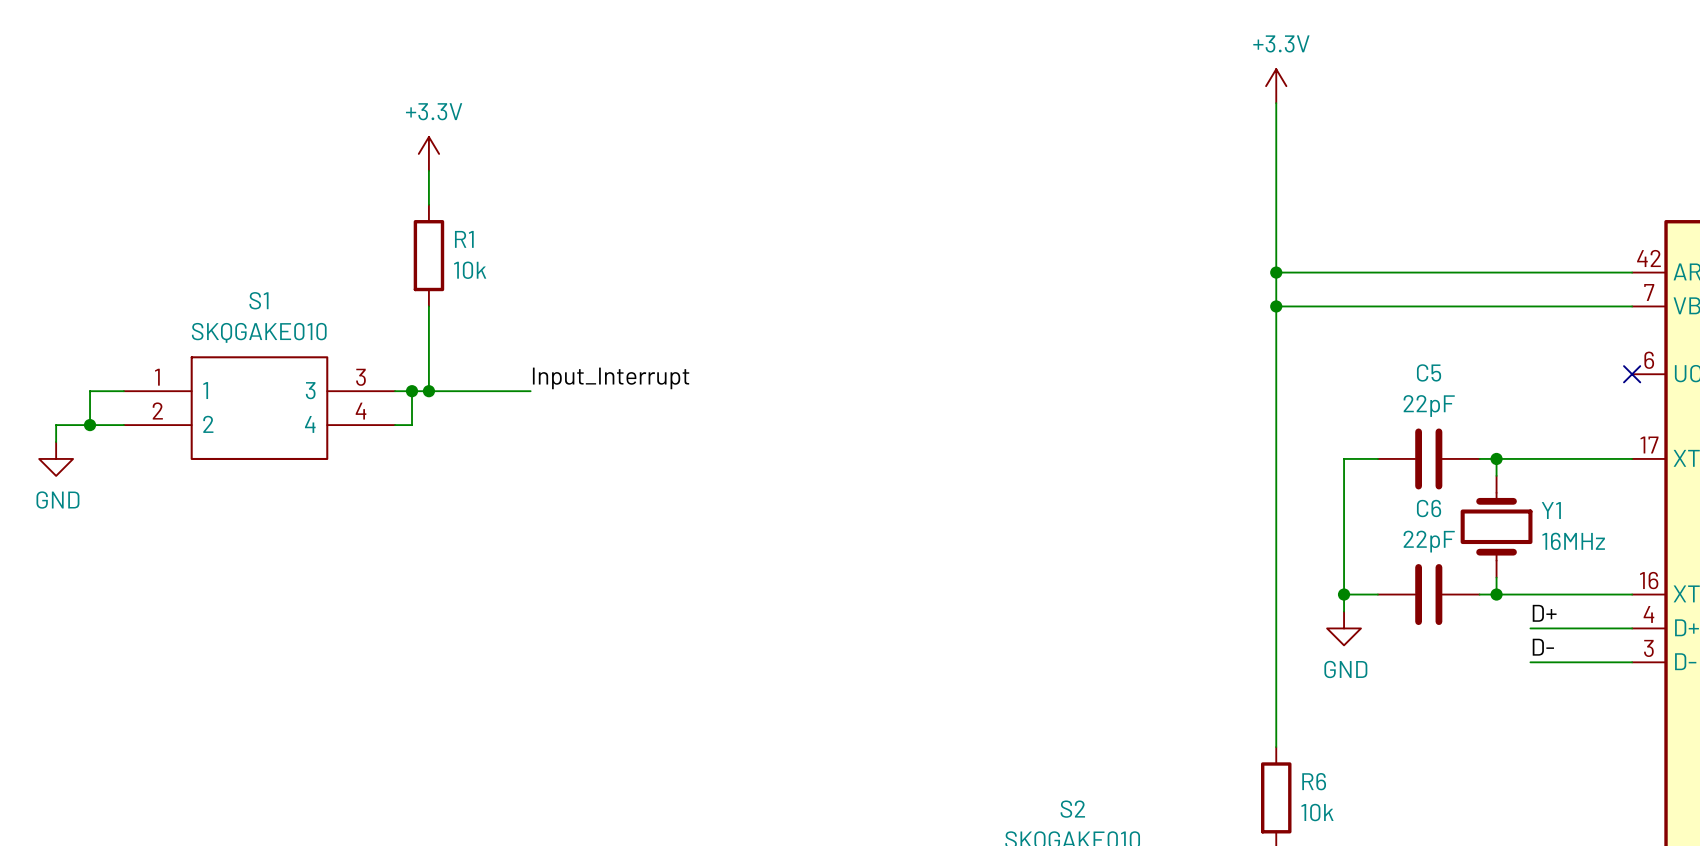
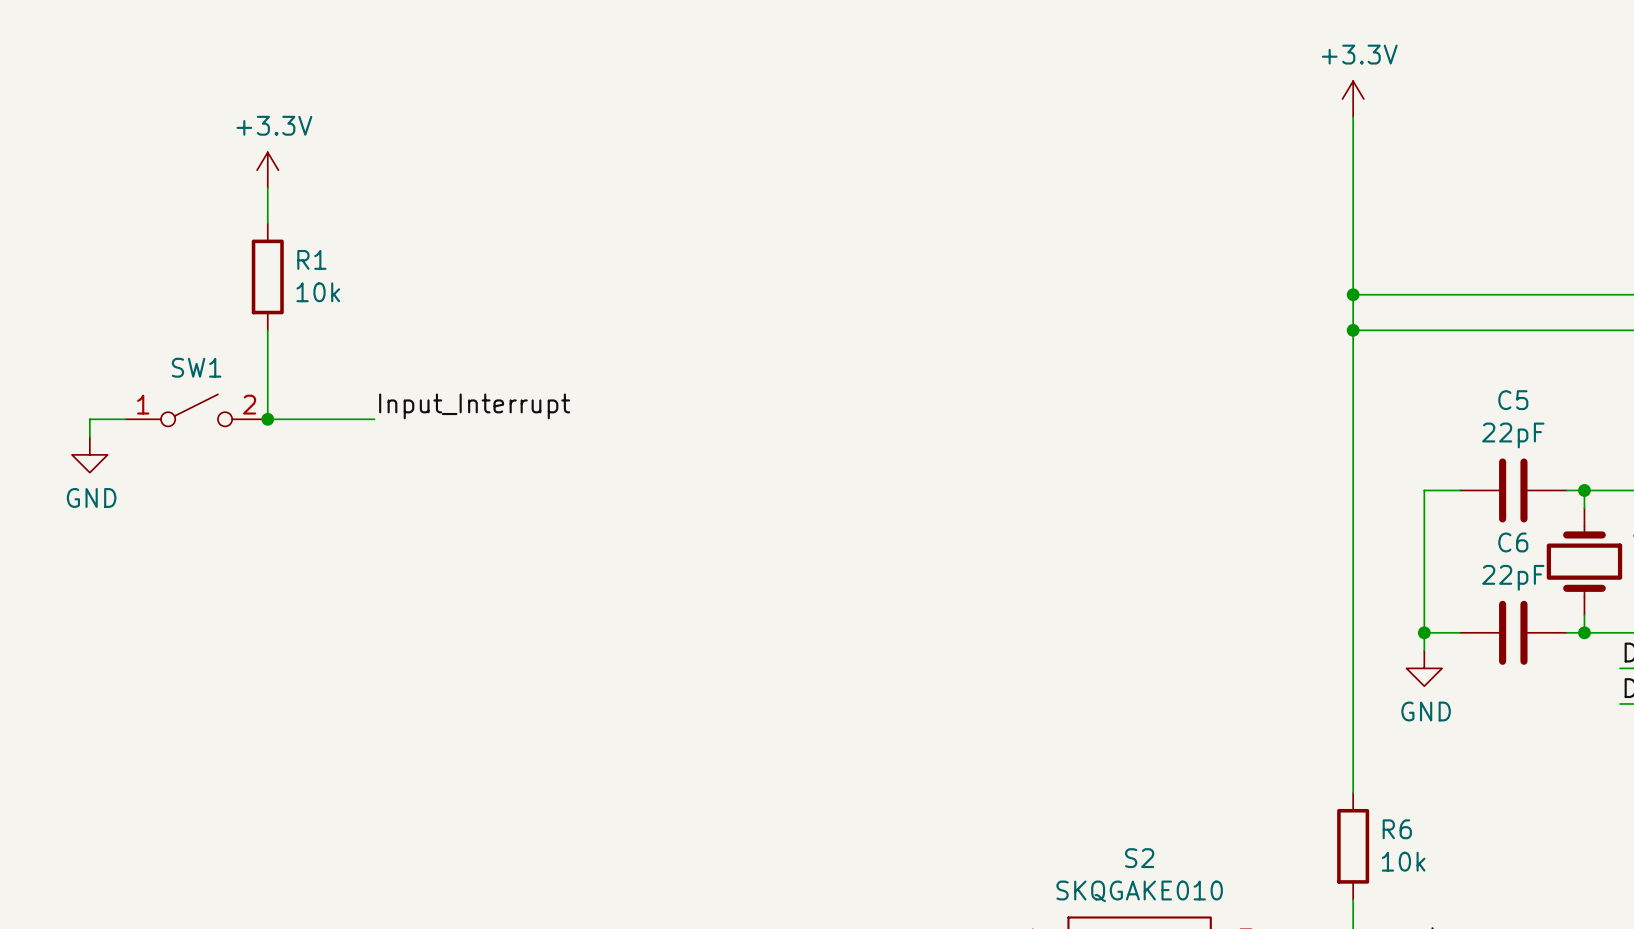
power symbol position: +3.3V (428, 153) -> +3.3V (267, 170)
wire: (428, 170) (428, 204) -> (267, 187) (267, 223)
R1 position: (428, 255) -> (267, 276)
wire: none -> (267, 330) (267, 419) (374, 419)
wire: (428, 306) (428, 391) -> none
label position: Input_Interrupt (611, 378) -> Input_Interrupt (474, 406)
SW1: none -> (196, 410)
wire: (90, 391) (90, 425) -> (107, 419) (89, 419) (89, 437)
junction: none -> (267, 419)
wire: (395, 391) (530, 391) -> none
wire: (412, 391) (412, 425) (395, 425) -> none
junction: (412, 391) -> none
junction: (428, 391) -> none
S1: SKQGAKE010 (259, 408) -> none
junction: (90, 425) -> none
wire: (123, 425) (56, 425) (56, 442) -> none
power symbol position: GND (56, 458) -> GND (89, 454)

